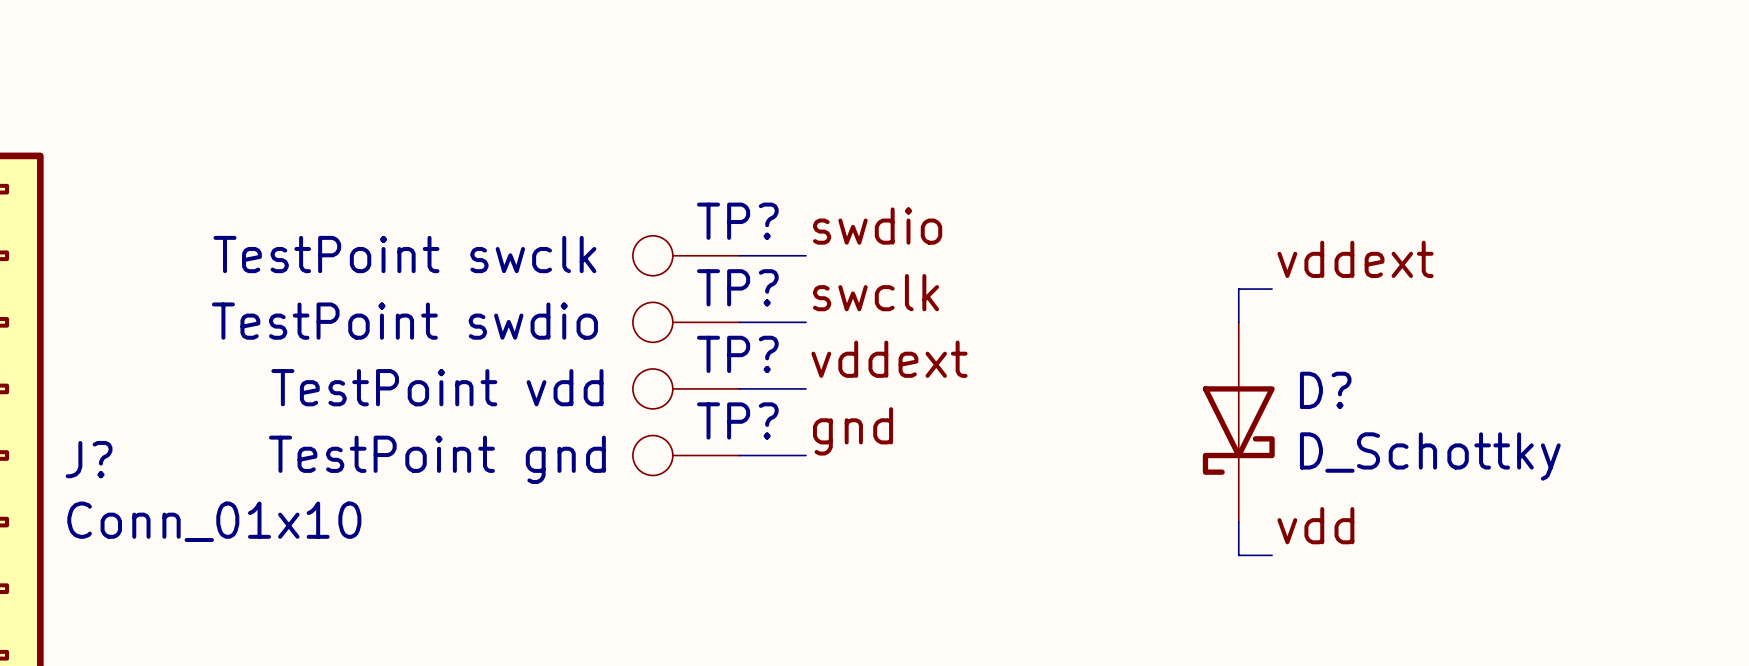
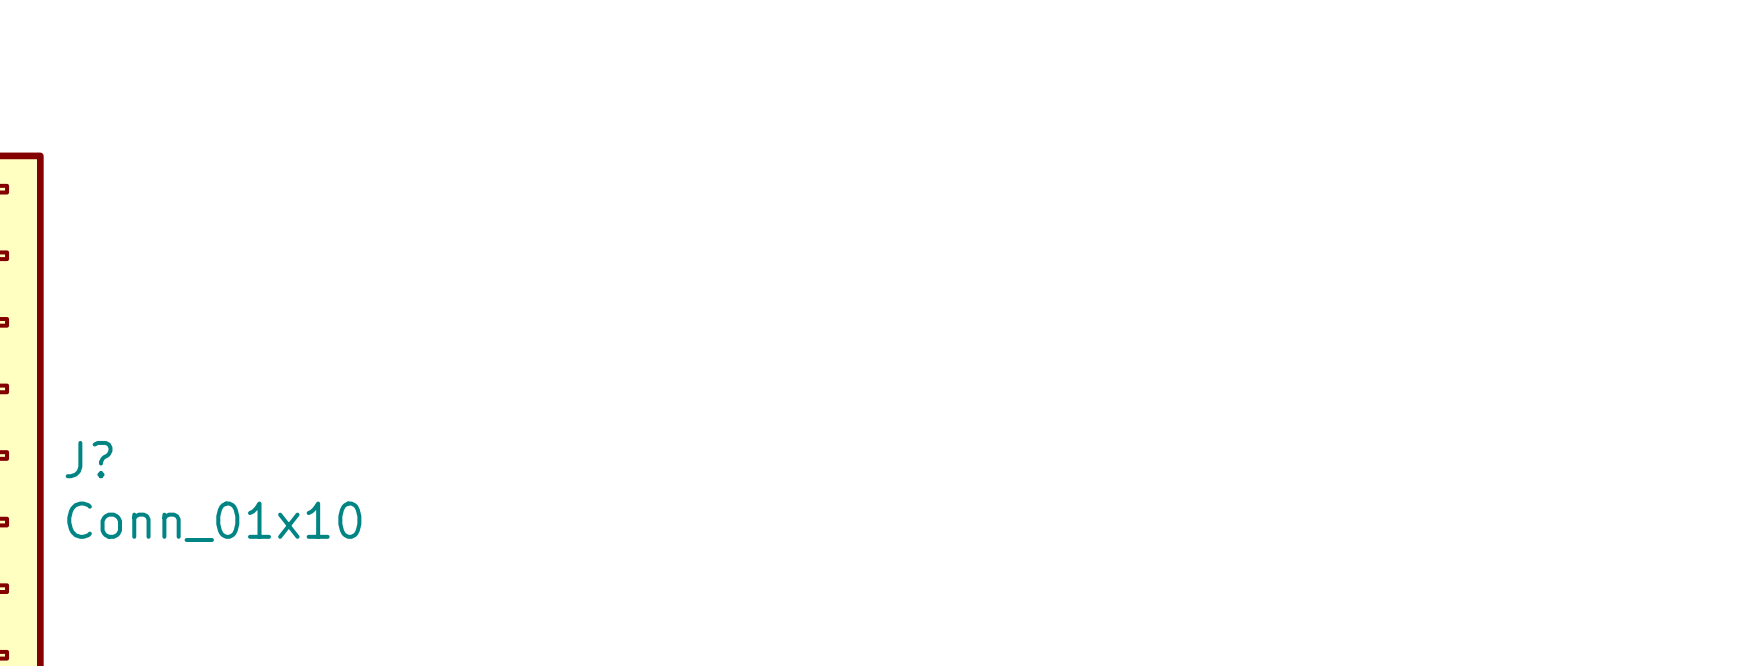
label: swdio (877, 226) -> none
TP?: TestPoint swclk (686, 255) -> none
wire: (739, 255) (806, 255) -> none
label: vddext (1355, 259) -> none
wire: (1272, 289) (1238, 289) (1238, 322) -> none
label: swclk (876, 292) -> none
TP?: TestPoint swdio (686, 322) -> none
wire: (739, 322) (806, 322) -> none
label: vddext (889, 359) -> none
TP?: TestPoint vdd (686, 388) -> none
wire: (739, 388) (806, 388) -> none
D?: D_Schottky (1238, 422) -> none
label: gnd (853, 431) -> none
TP?: TestPoint gnd (686, 455) -> none
wire: (739, 455) (806, 455) -> none
wire: (1238, 522) (1238, 555) (1272, 555) -> none
label: vdd (1315, 525) -> none

